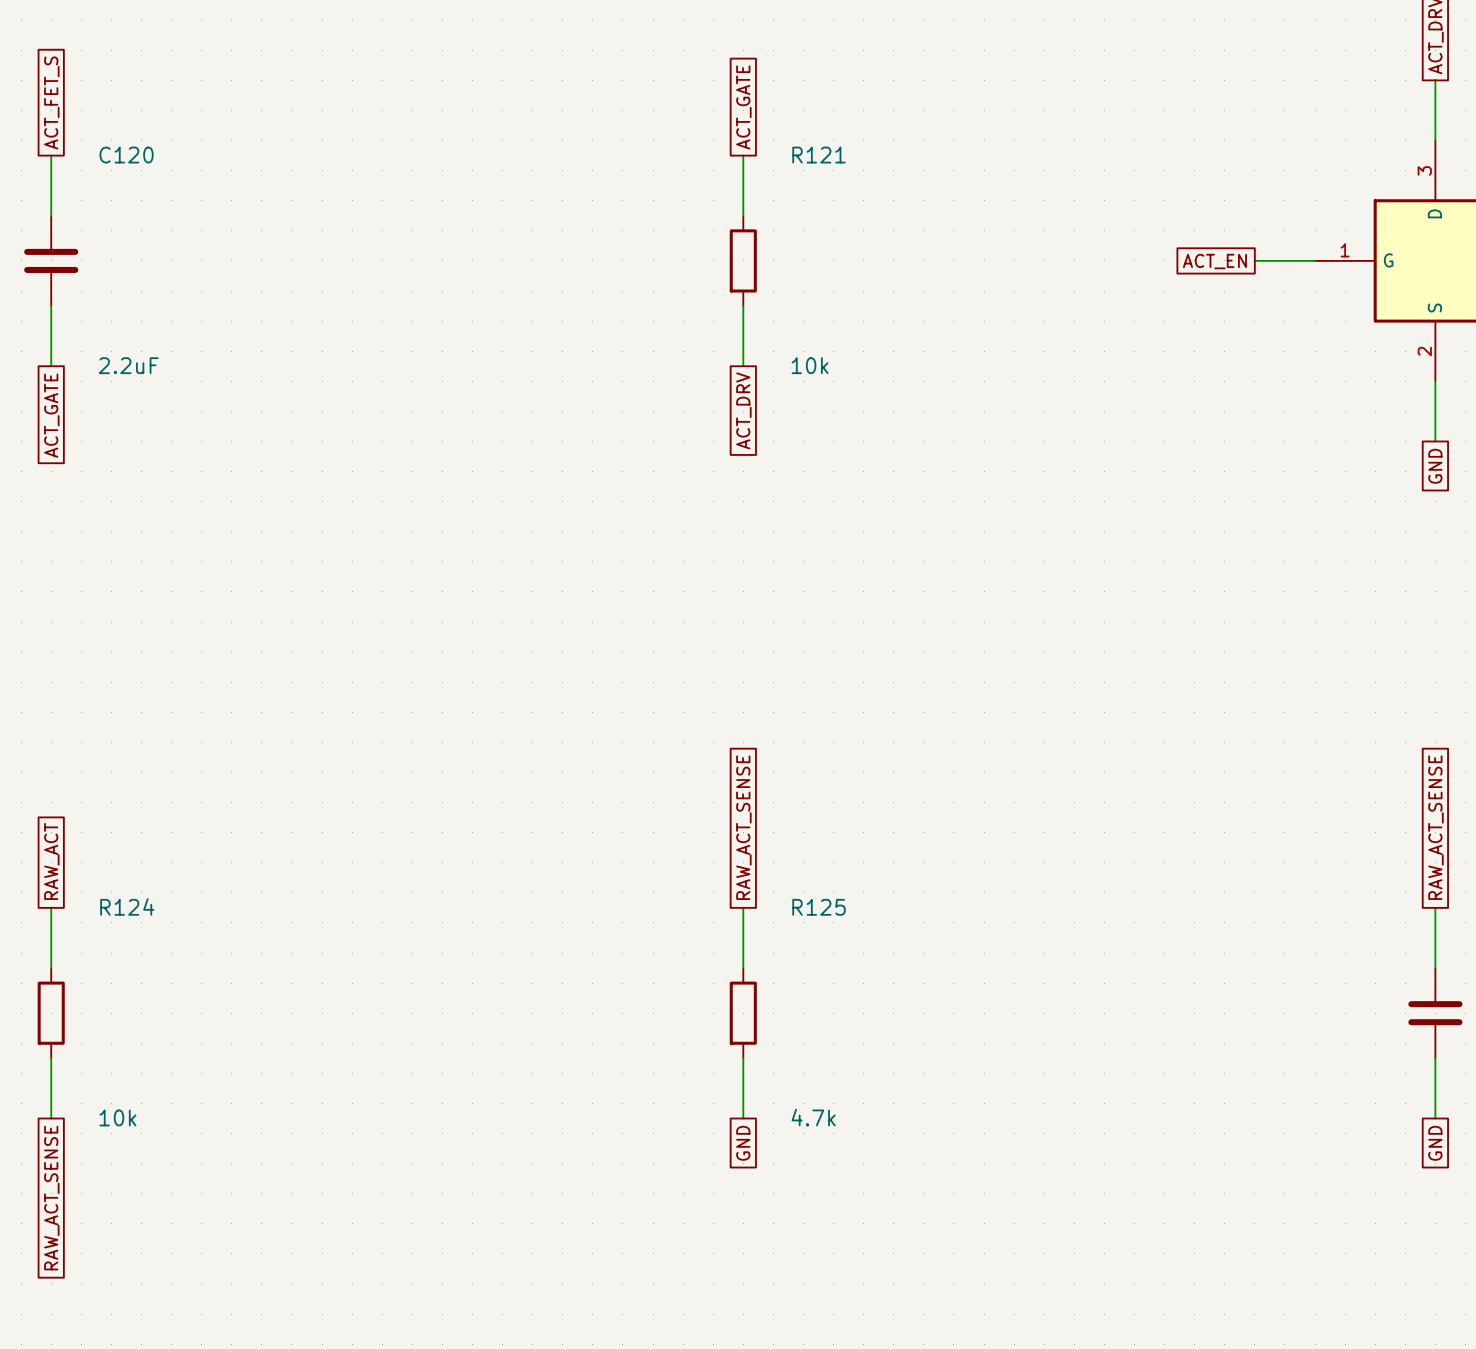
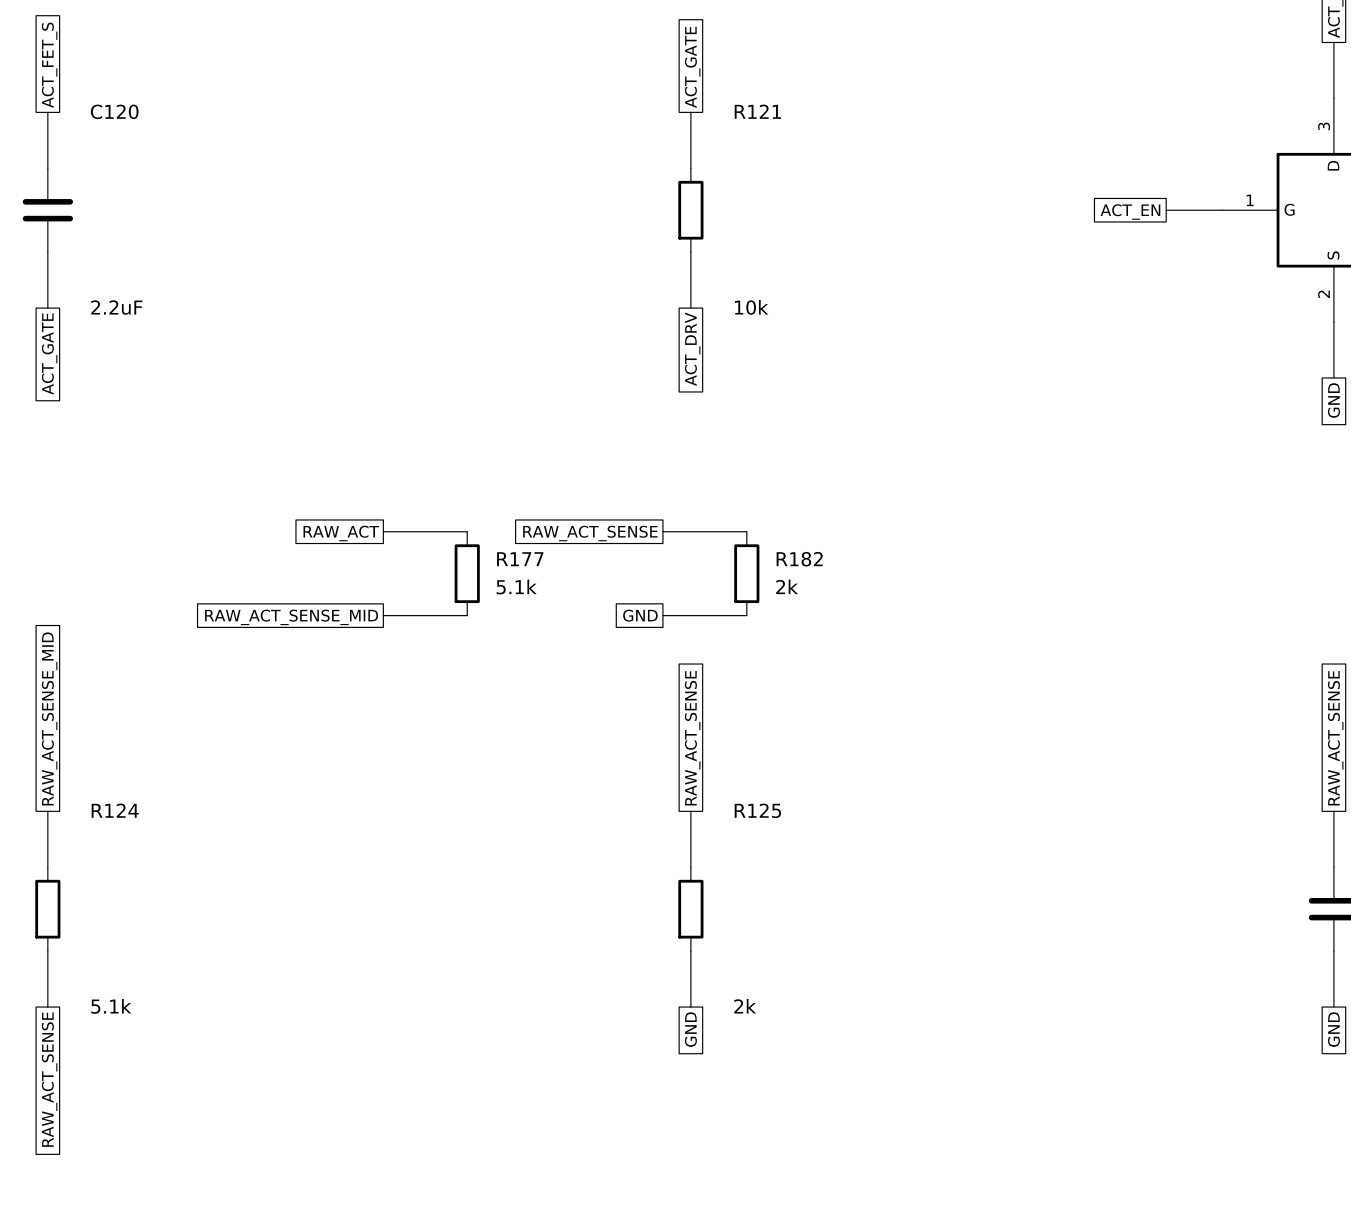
wire: none -> (383, 531) (467, 531)
wire: none -> (662, 531) (746, 531)
global label: none -> RAW_ACT (341, 533)
global label: none -> RAW_ACT_SENSE (590, 533)
R177: none -> 5.1k (467, 573)
R182: none -> 2k (746, 573)
global label: none -> RAW_ACT_SENSE_MID (291, 617)
wire: none -> (383, 615) (467, 615)
global label: none -> GND (640, 615)
wire: none -> (662, 615) (746, 615)
global label: RAW_ACT (51, 861) -> RAW_ACT_SENSE_MID (49, 718)
R124 value: 10k (117, 1117) -> 5.1k (111, 1006)
R125 value: 4.7k (813, 1117) -> 2k (745, 1006)

